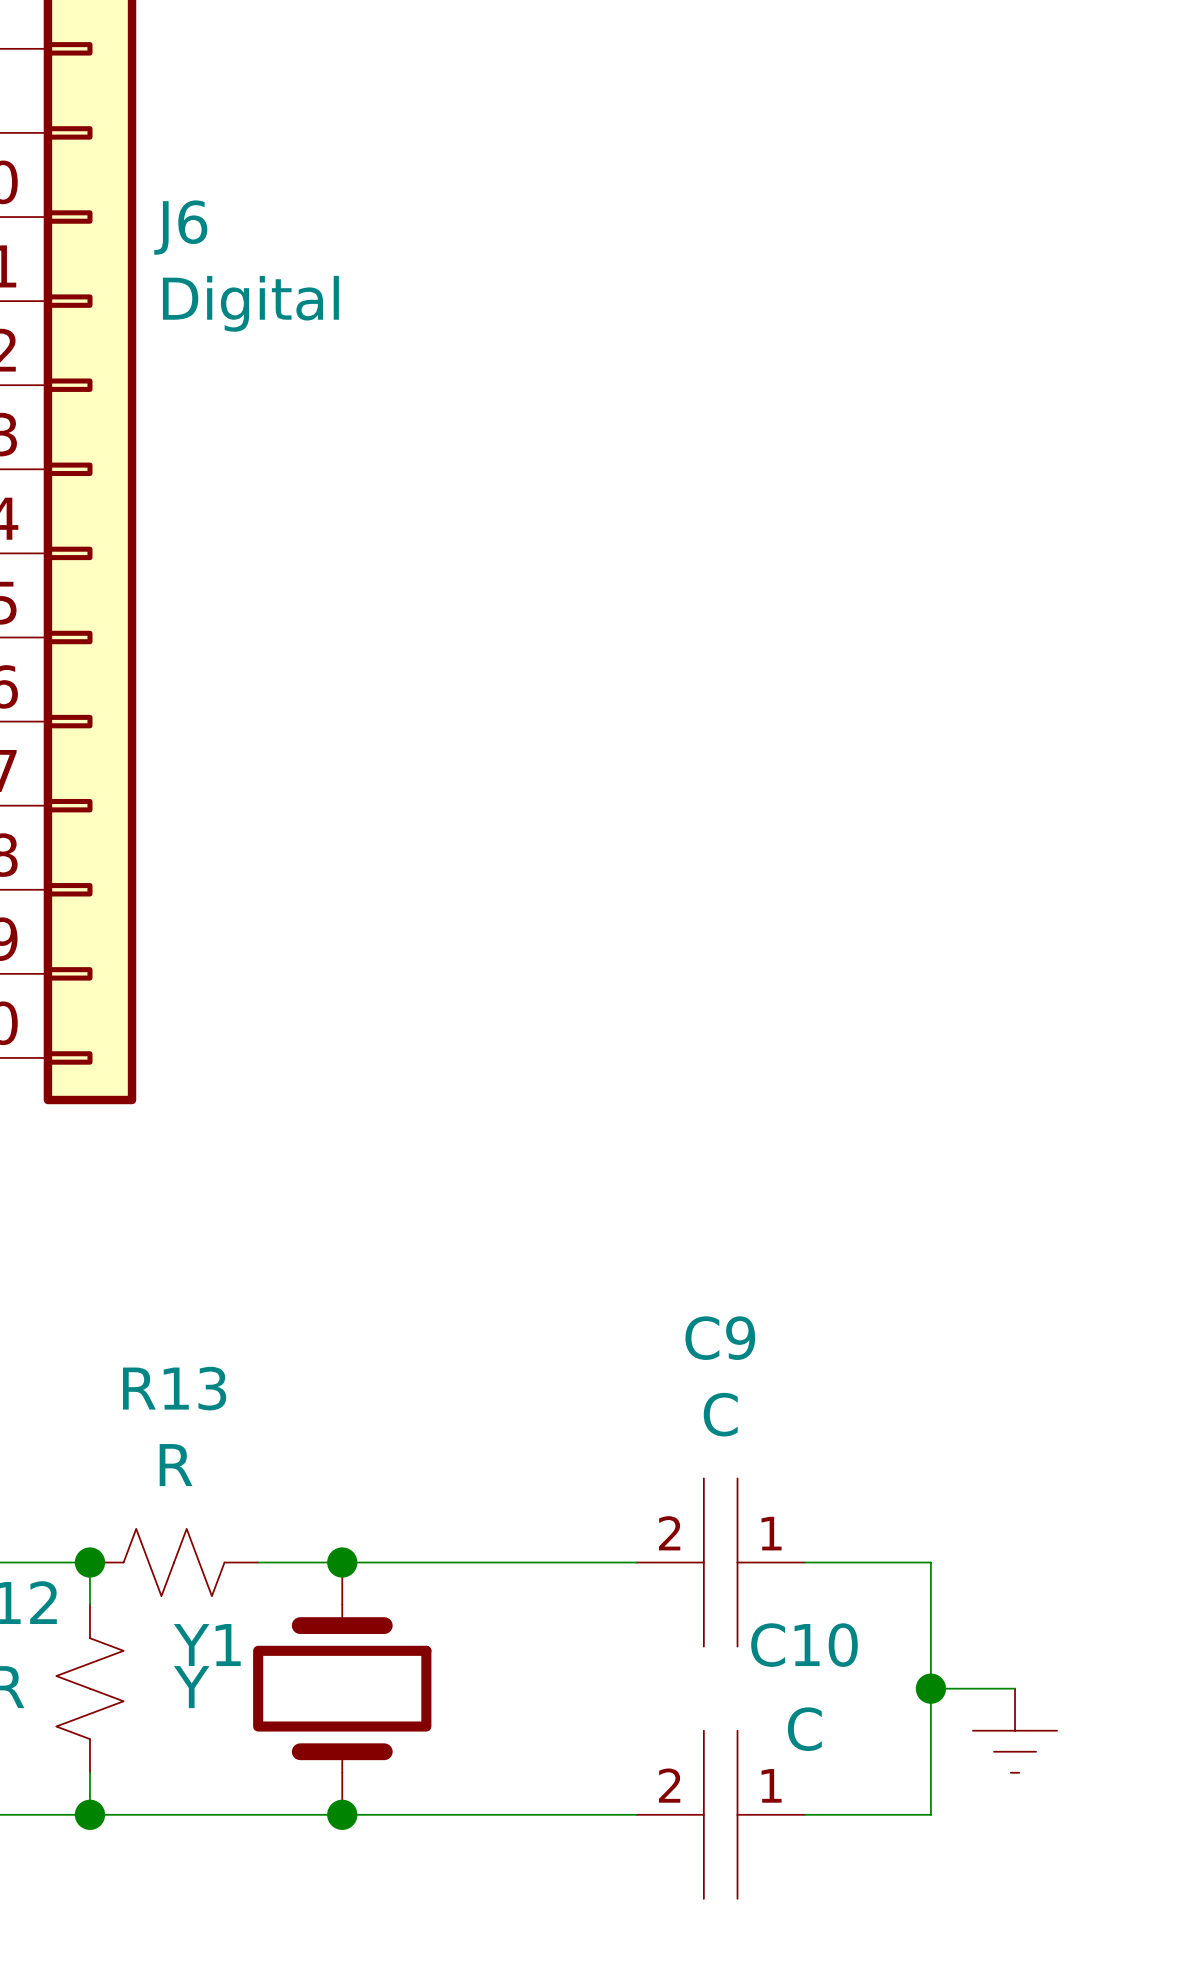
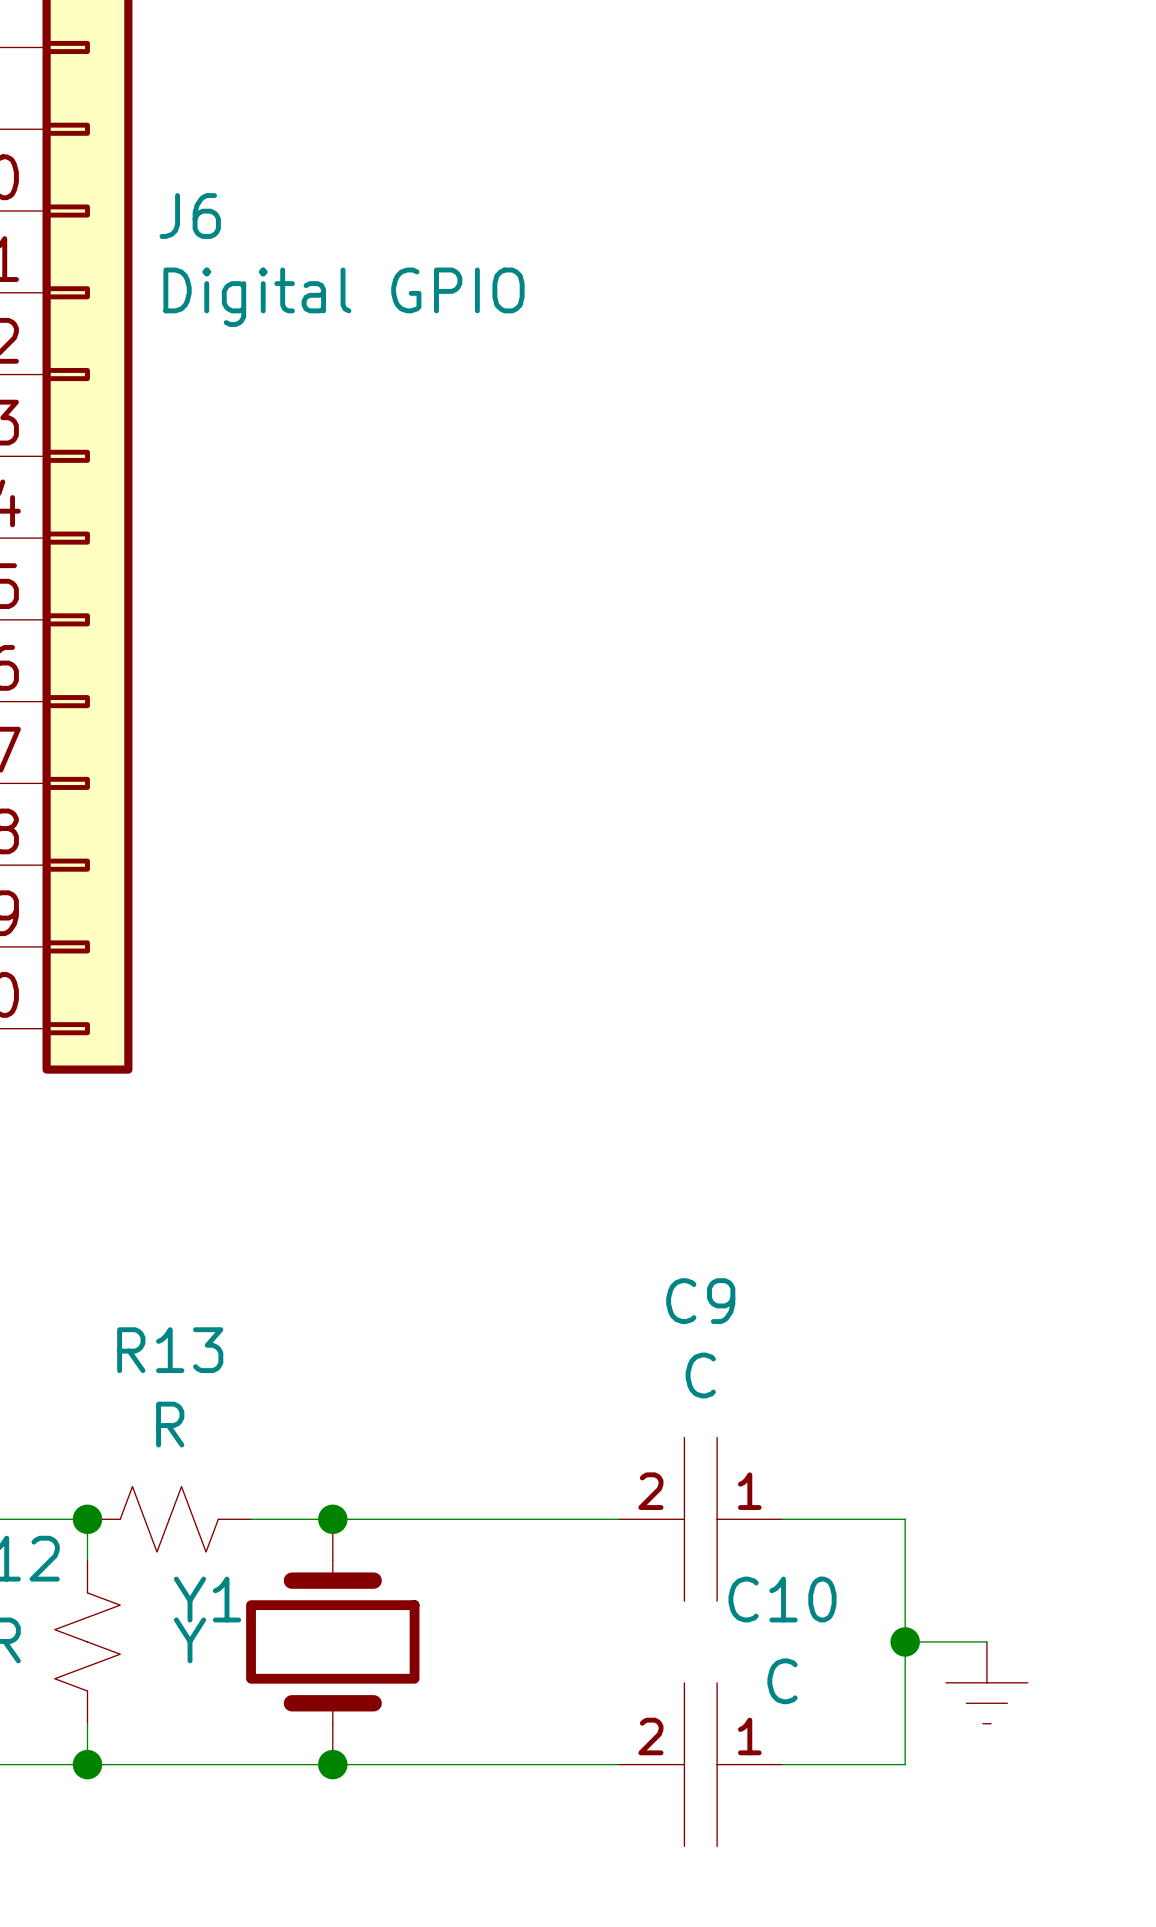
J6 value: Digital (250, 303) -> Digital GPIO (344, 297)

